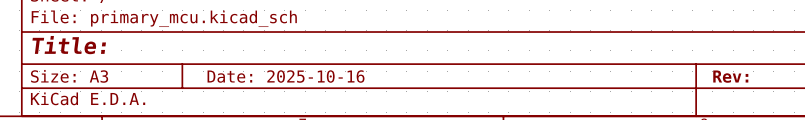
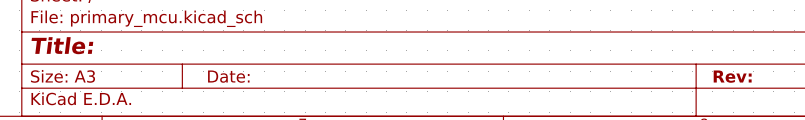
title block: Date: 2025-10-16 (286, 76) -> Date: (228, 76)

